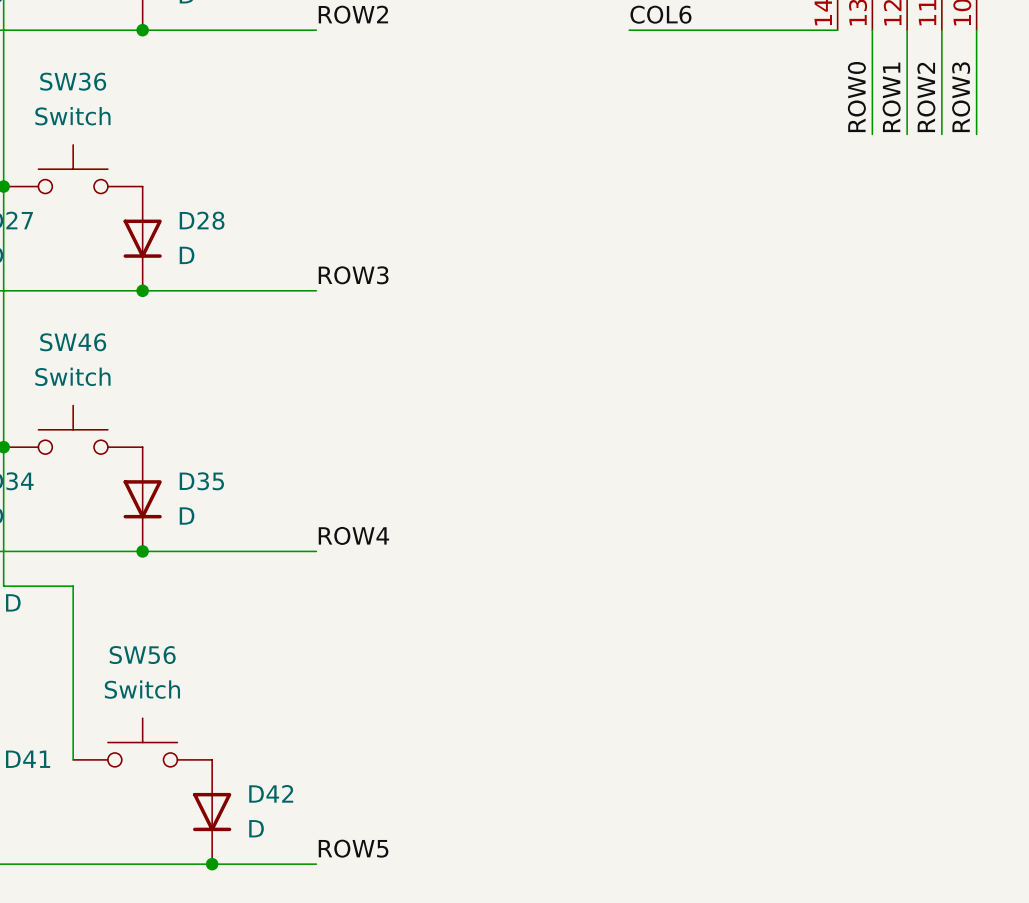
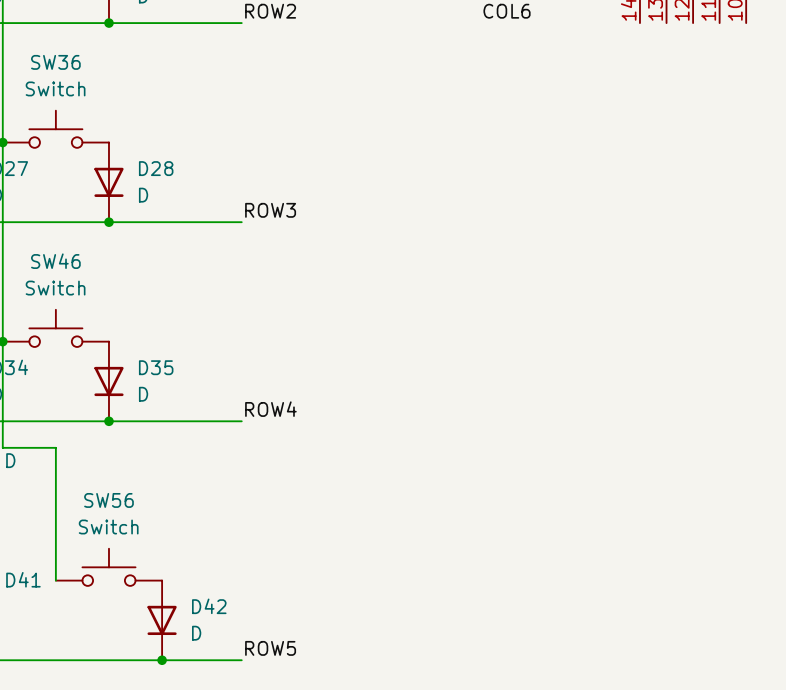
wire: (629, 30) (837, 30) -> none
wire: (872, 30) (872, 134) -> none
wire: (907, 30) (907, 134) -> none
wire: (941, 30) (941, 134) -> none
wire: (976, 30) (976, 134) -> none
label: ROW0 (856, 97) -> none
label: ROW1 (891, 97) -> none
label: ROW2 (926, 97) -> none
label: ROW3 (961, 97) -> none

